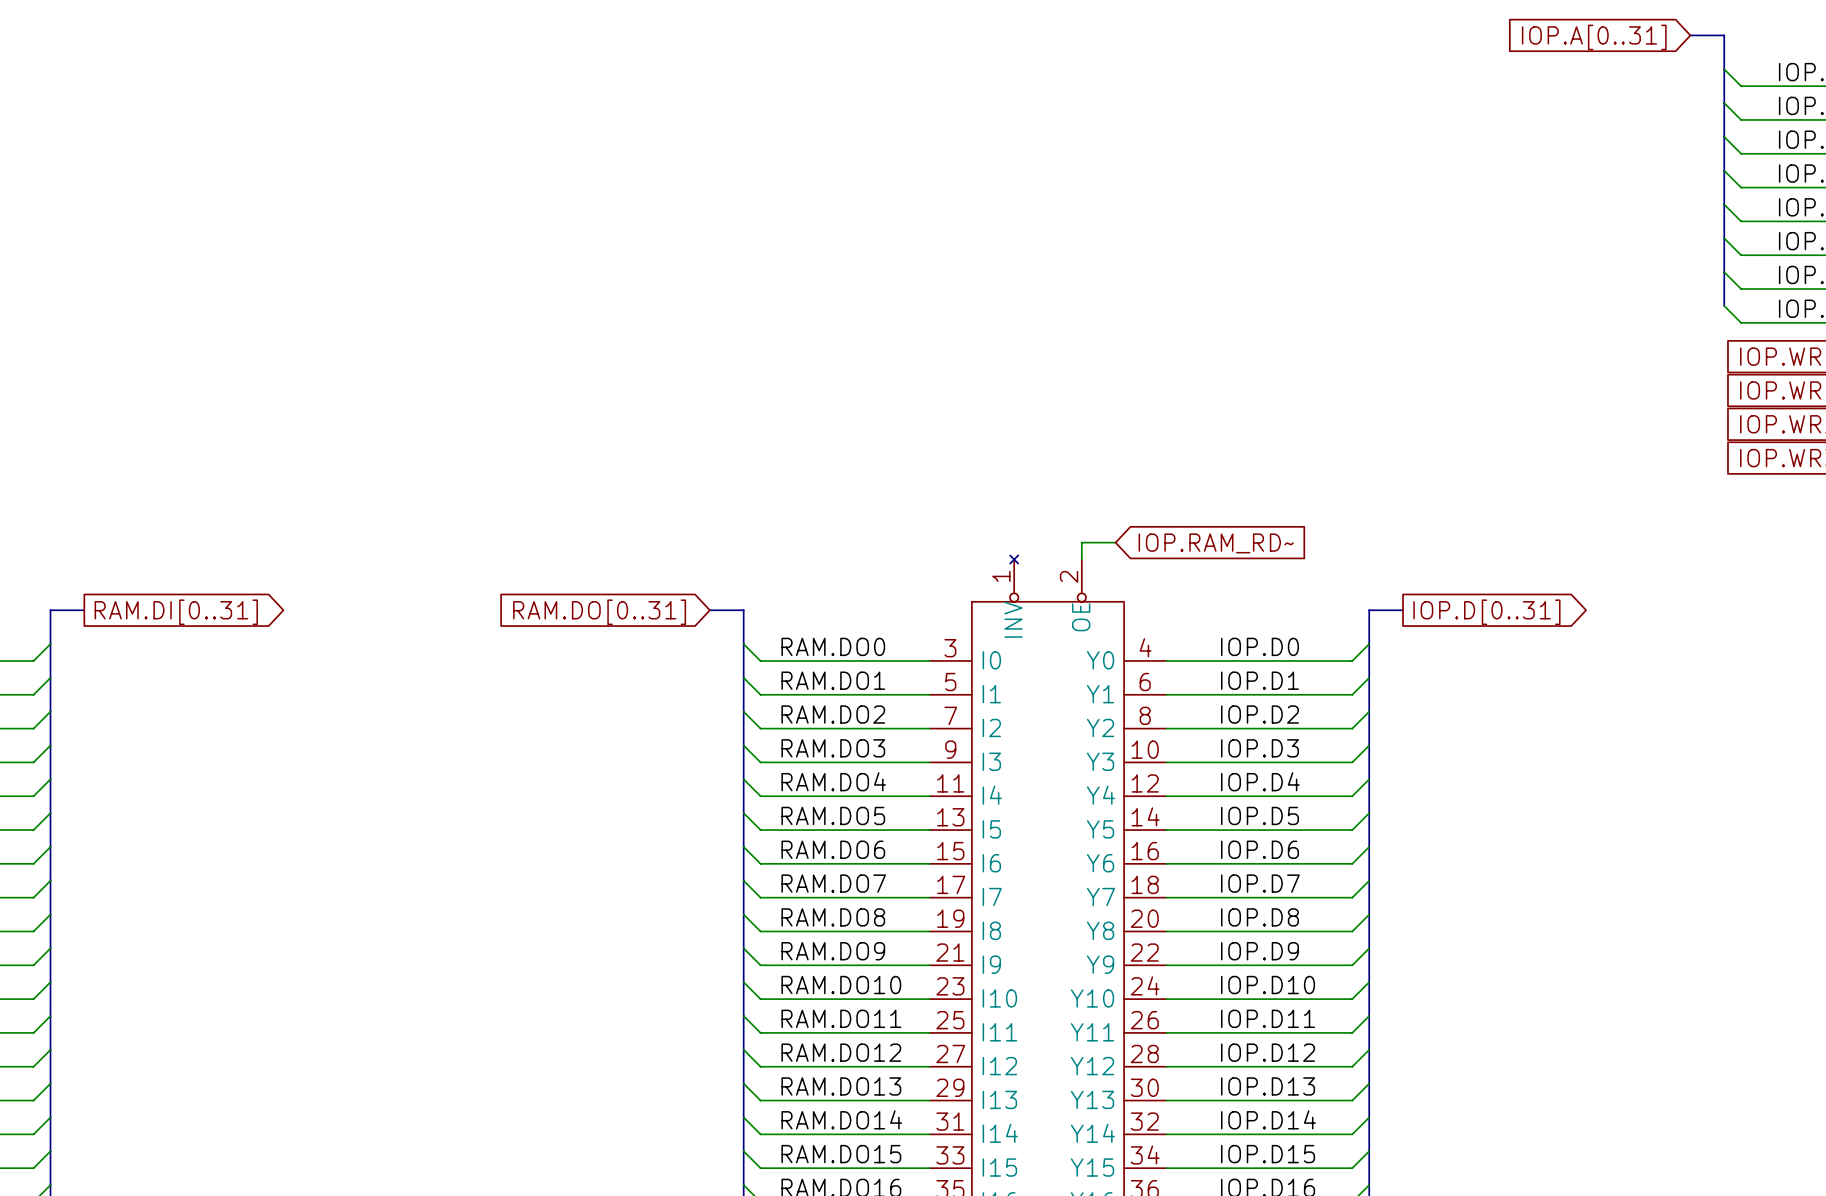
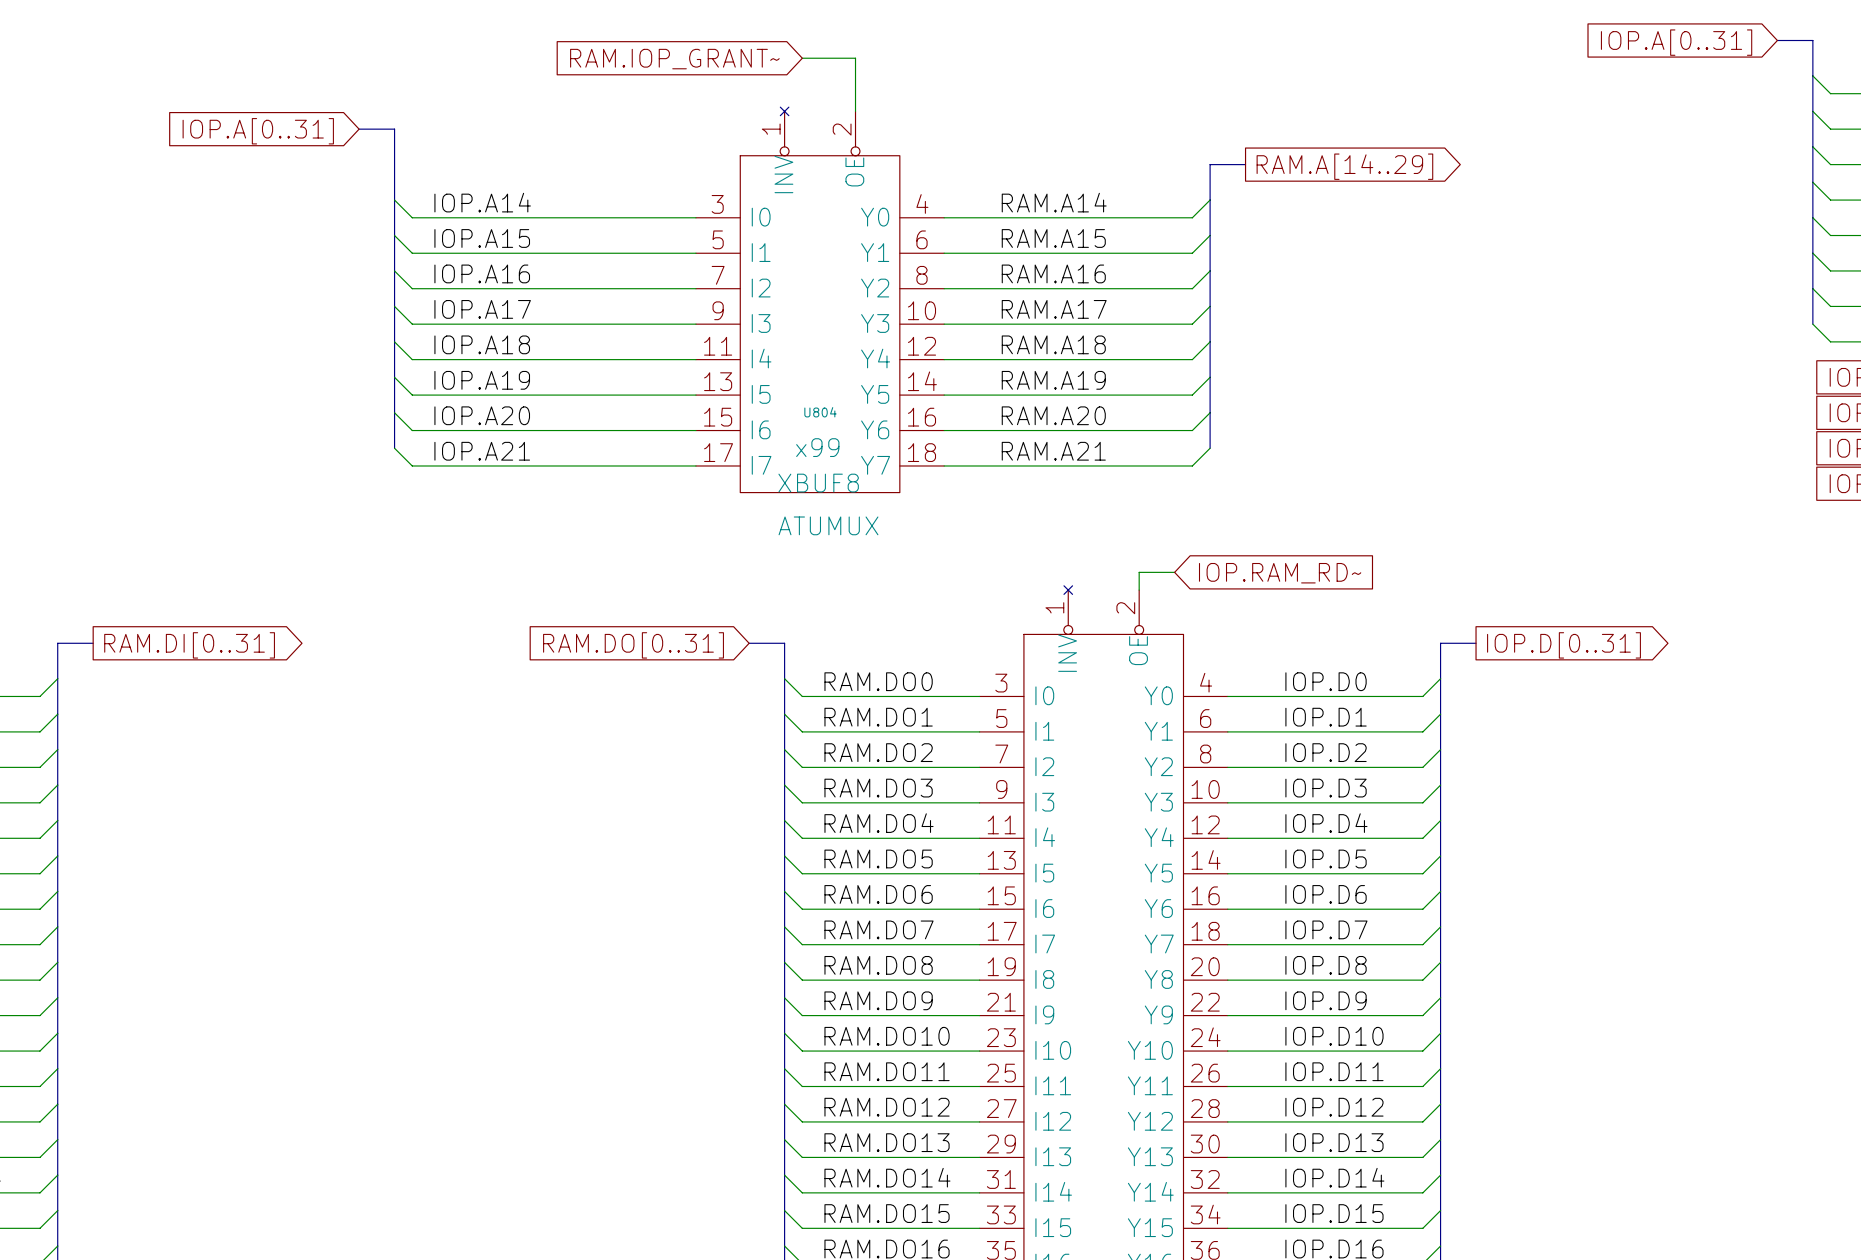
wire: none -> (802, 58) (855, 58) (855, 111)
global label: none -> RAM.IOP_GRANT~ (674, 59)
no-connect mark: none -> (784, 111)
bus: none -> (359, 129) (394, 129) (394, 448)
global label: none -> IOP.A[0..31] (258, 131)
bus: none -> (1245, 164) (1210, 164) (1210, 448)
global label: none -> RAM.A[14..29] (1344, 166)
wire: none -> (394, 200) (412, 217) (695, 217)
wire: none -> (1210, 200) (1192, 217) (944, 217)
label: none -> IOP.A14 (482, 202)
label: none -> RAM.A14 (1054, 202)
wire: none -> (394, 235) (412, 253) (695, 253)
wire: none -> (1210, 235) (1192, 253) (944, 253)
label: none -> IOP.A15 (482, 238)
label: none -> RAM.A15 (1053, 238)
wire: none -> (394, 270) (412, 288) (695, 288)
wire: none -> (1210, 270) (1192, 288) (944, 288)
label: none -> IOP.A16 (482, 273)
label: none -> RAM.A16 (1053, 273)
U804: none -> XBUF8 (820, 302)
wire: none -> (394, 306) (412, 324) (695, 324)
wire: none -> (1210, 306) (1192, 324) (944, 324)
label: none -> IOP.A17 (482, 309)
label: none -> RAM.A17 (1054, 309)
wire: none -> (394, 341) (412, 359) (695, 359)
wire: none -> (1210, 341) (1192, 359) (944, 359)
label: none -> IOP.A18 (482, 344)
label: none -> RAM.A18 (1053, 344)
wire: none -> (394, 377) (412, 395) (695, 395)
wire: none -> (1210, 377) (1192, 395) (944, 395)
label: none -> IOP.A19 (482, 380)
label: none -> RAM.A19 (1053, 380)
wire: none -> (394, 412) (412, 430) (695, 430)
wire: none -> (1210, 412) (1192, 430) (944, 430)
label: none -> IOP.A20 (482, 415)
label: none -> RAM.A20 (1053, 415)
wire: none -> (394, 448) (412, 465) (695, 465)
wire: none -> (1210, 448) (1192, 465) (944, 465)
label: none -> IOP.A21 (482, 451)
label: none -> RAM.A21 (1053, 451)

